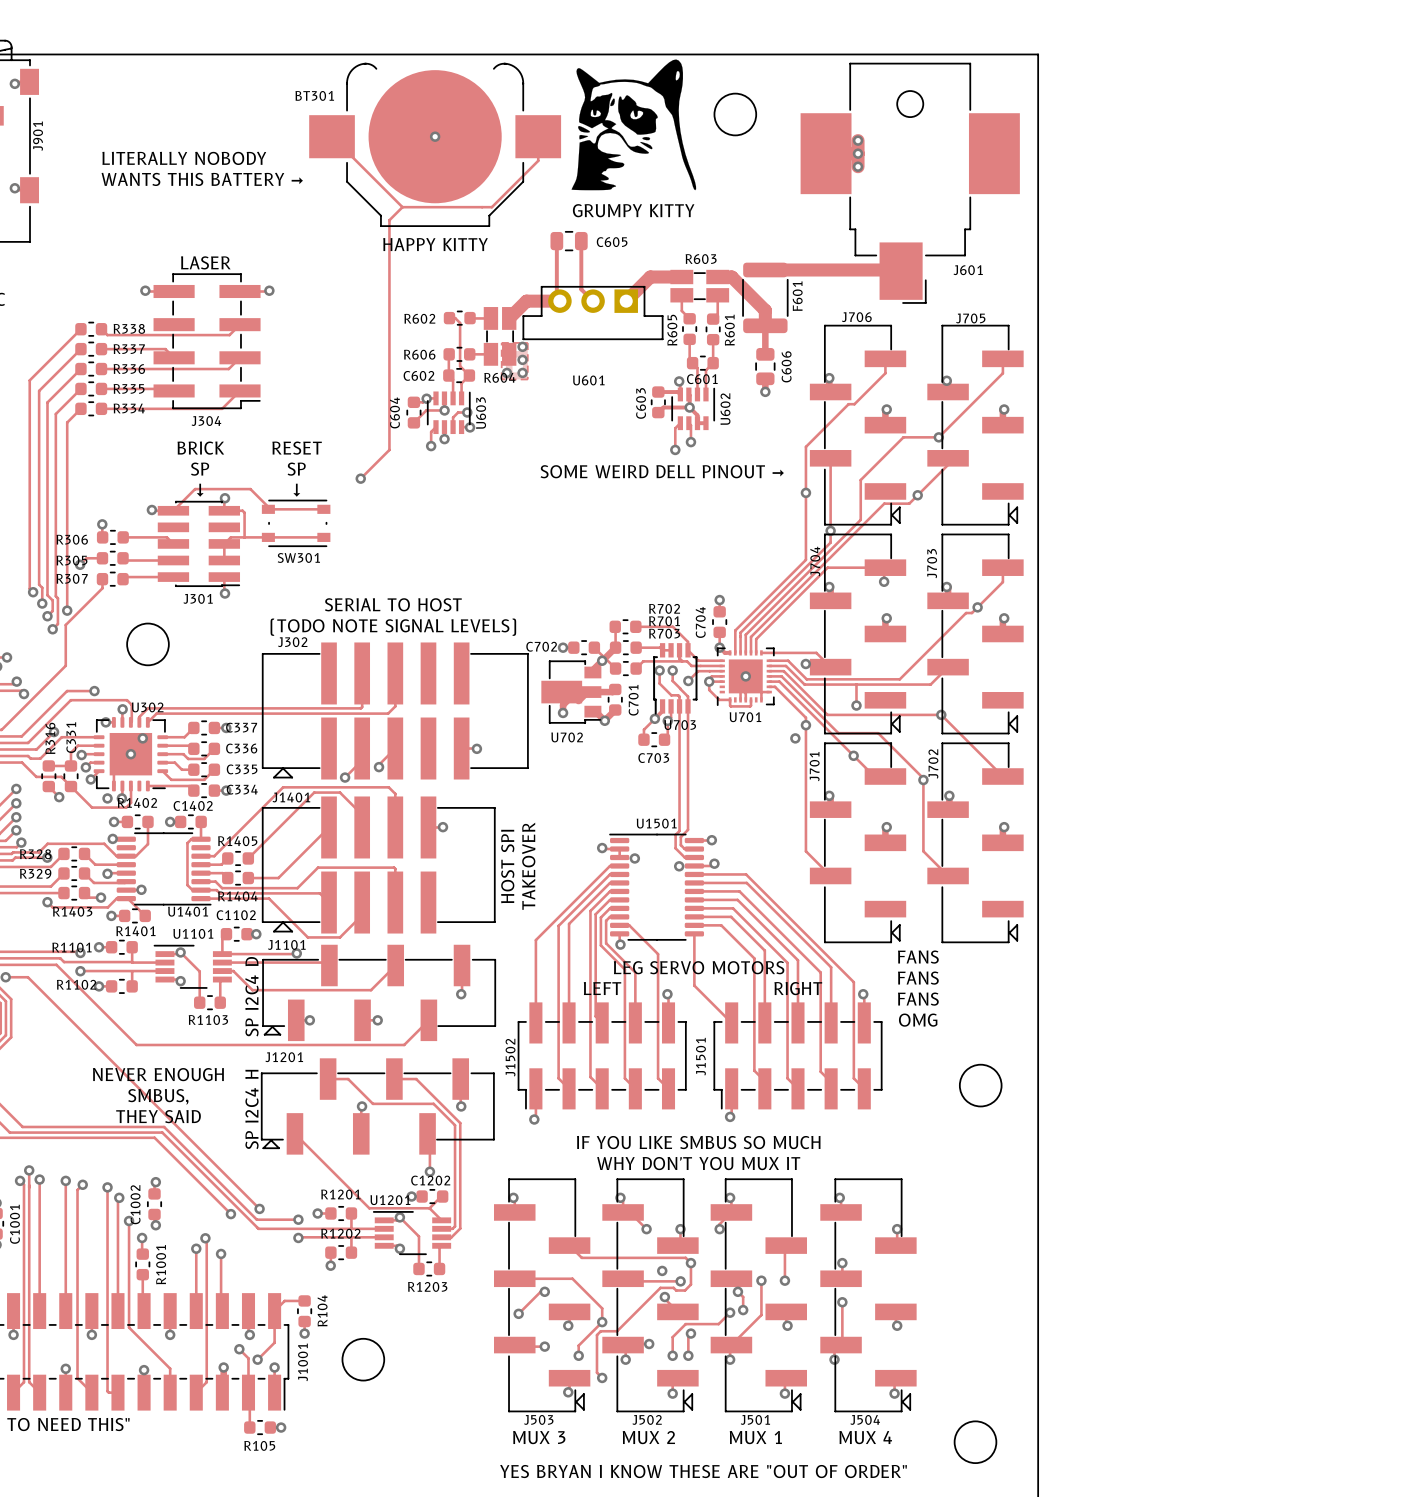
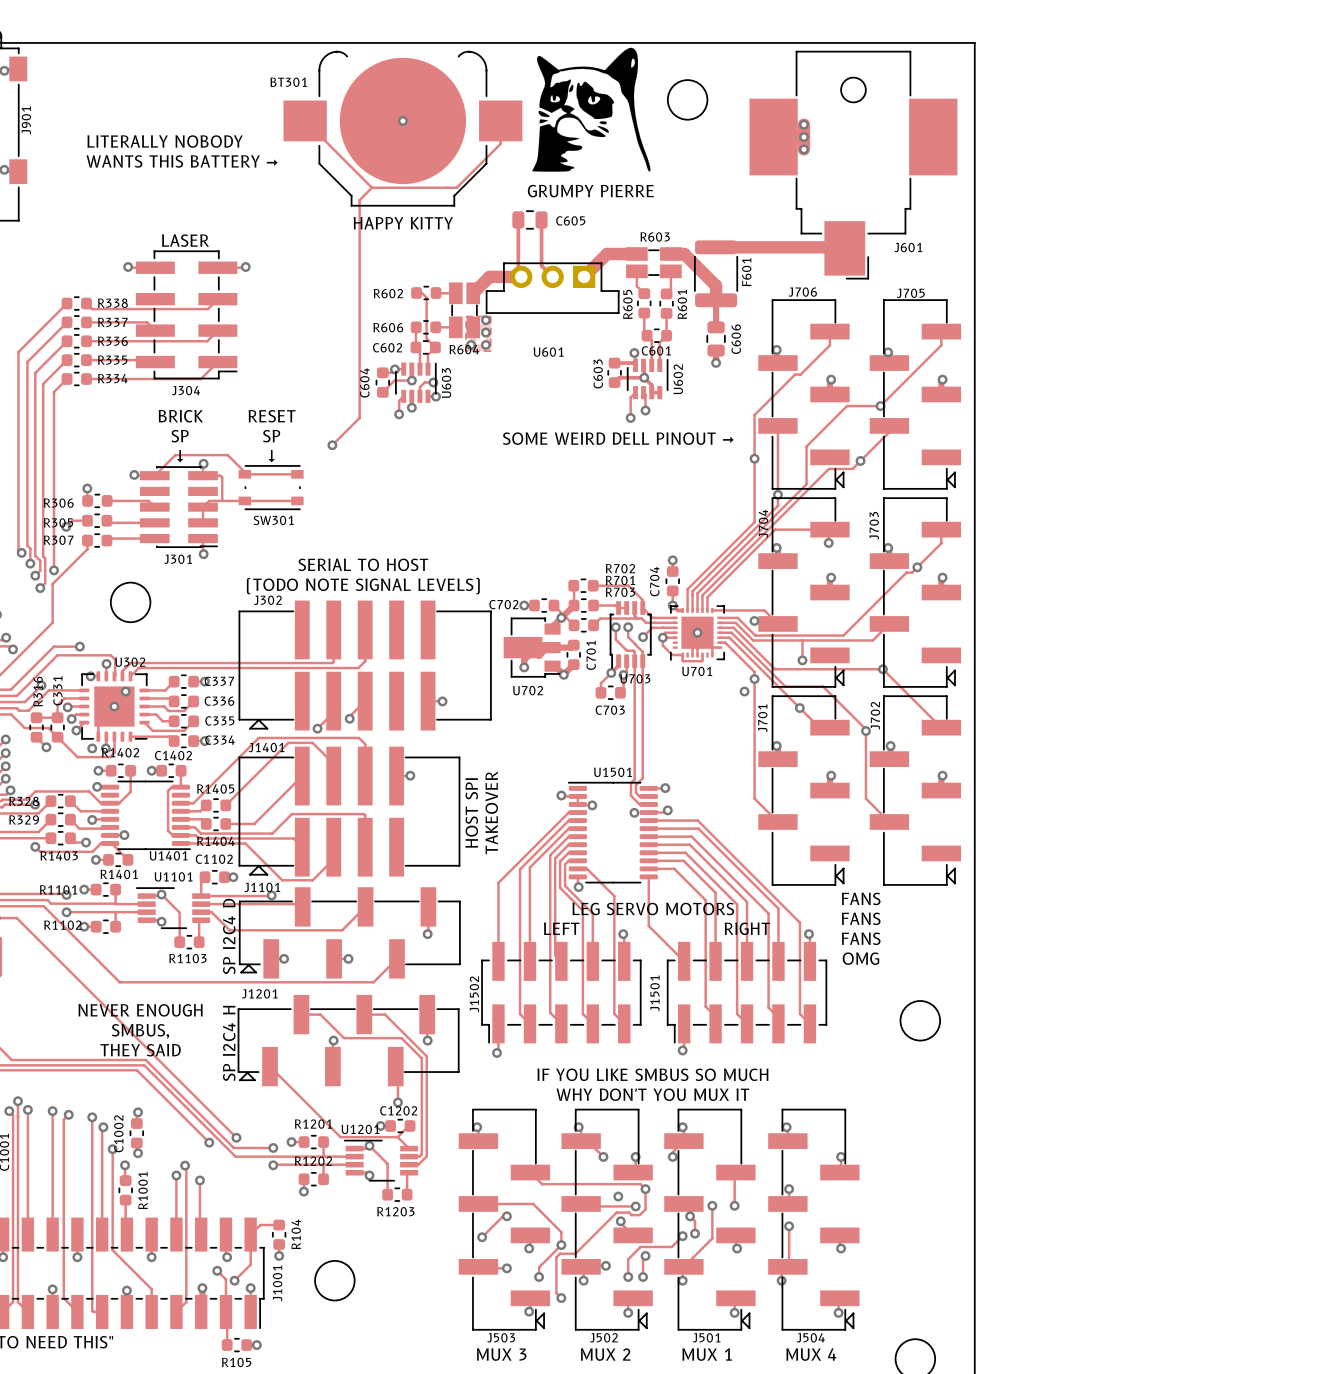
text: GRUMPY KITTY (633, 210) -> GRUMPY PIERRE (590, 191)

